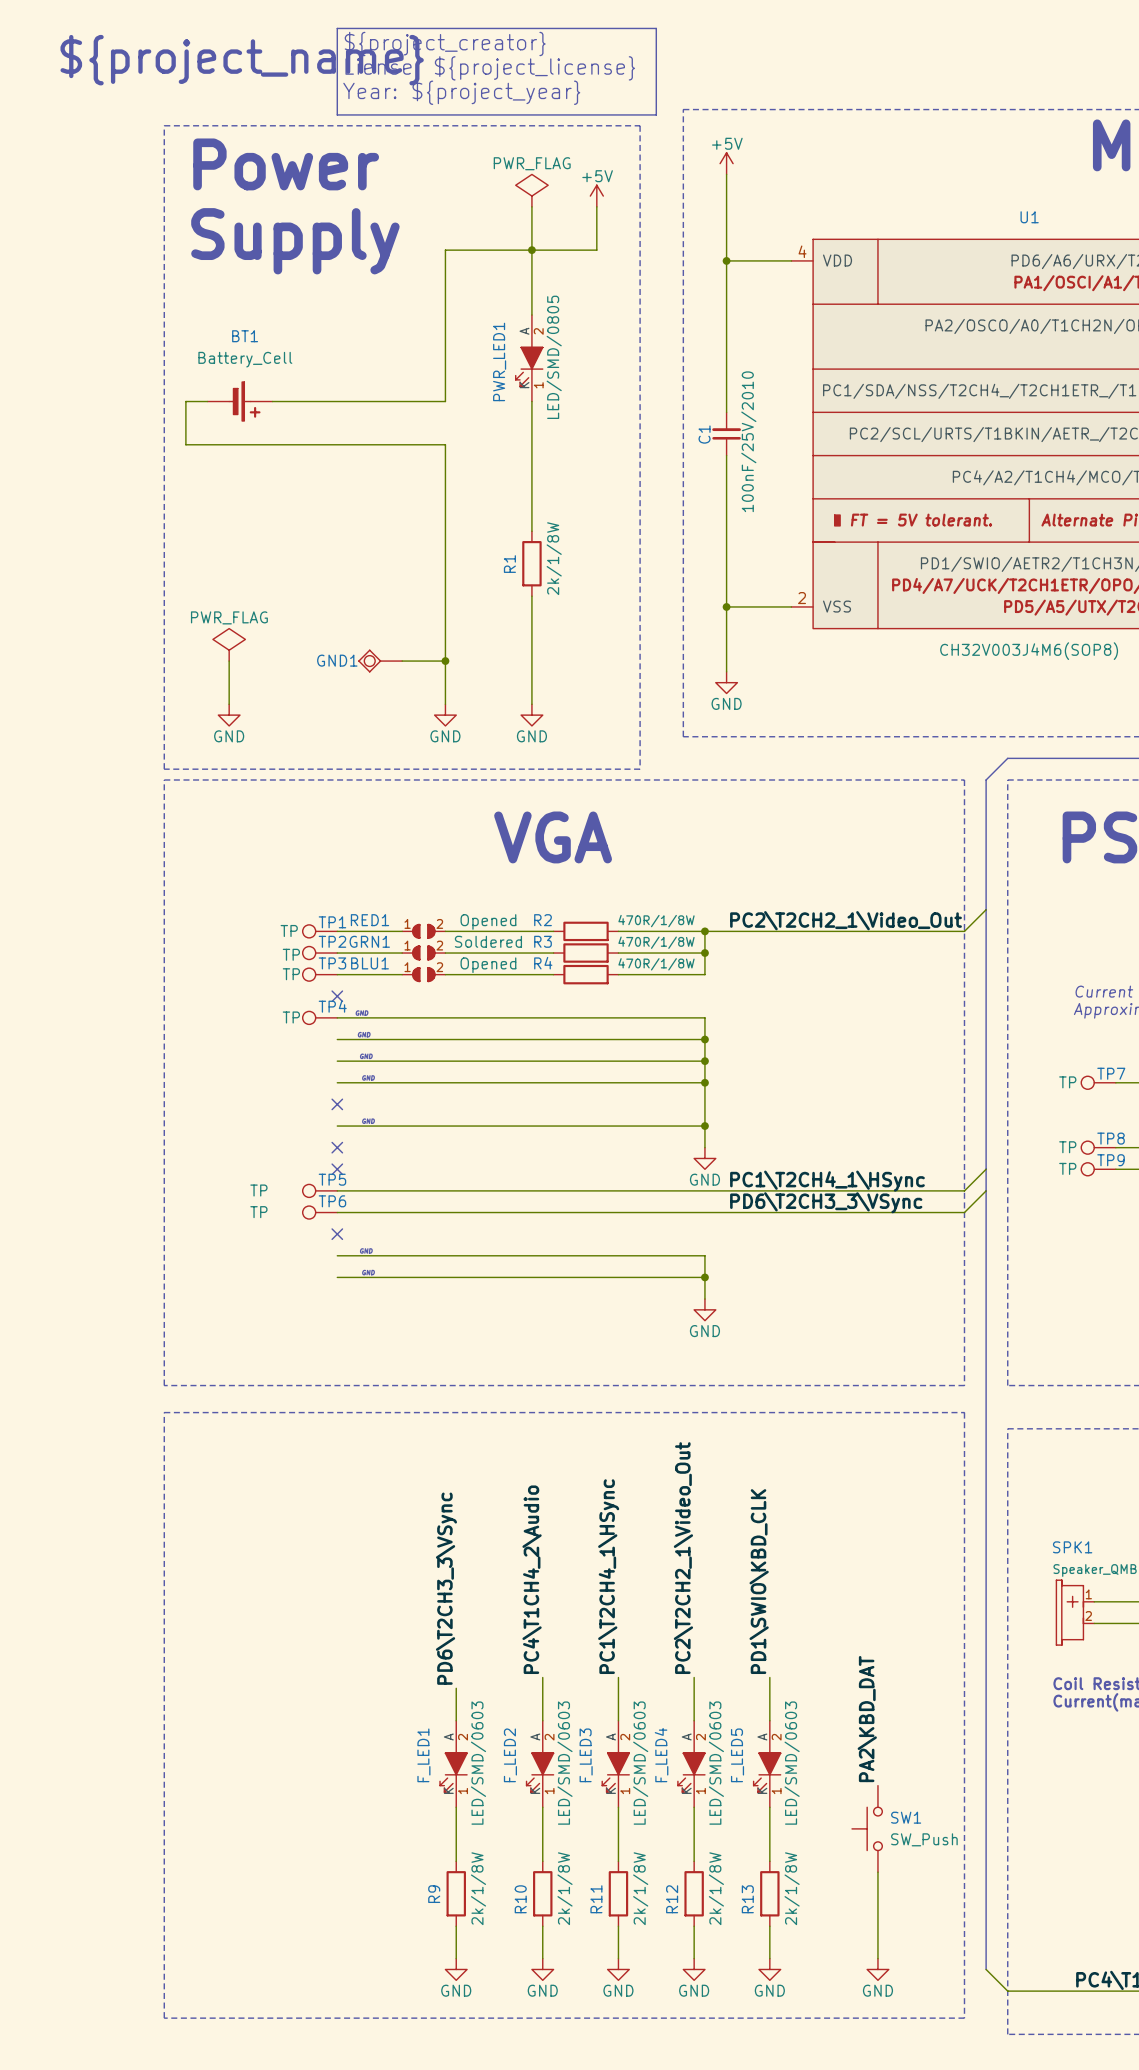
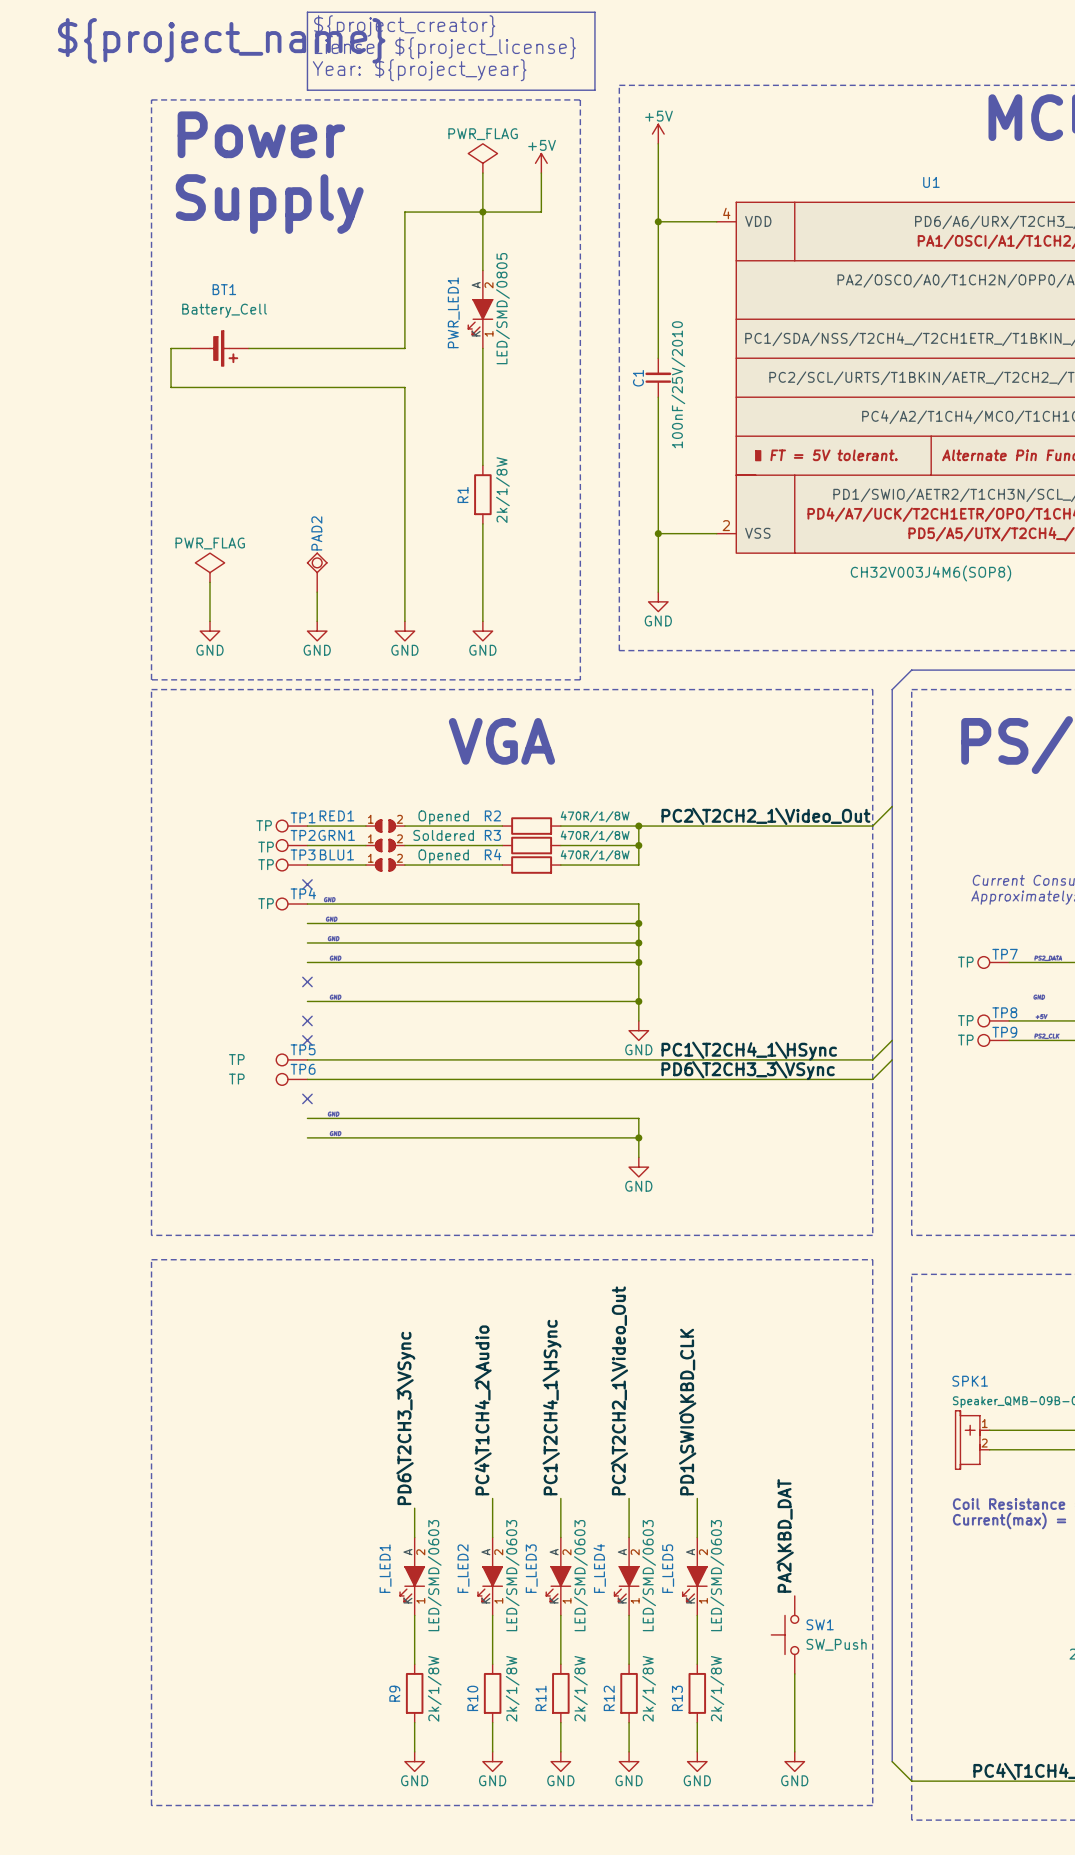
PAD2: none -> (317, 572)
GND1: (380, 661) -> none
wire: (402, 661) (445, 661) -> none
junction: (445, 661) -> none
wire: none -> (317, 592) (317, 621)
power symbol: none -> GND (317, 631)

